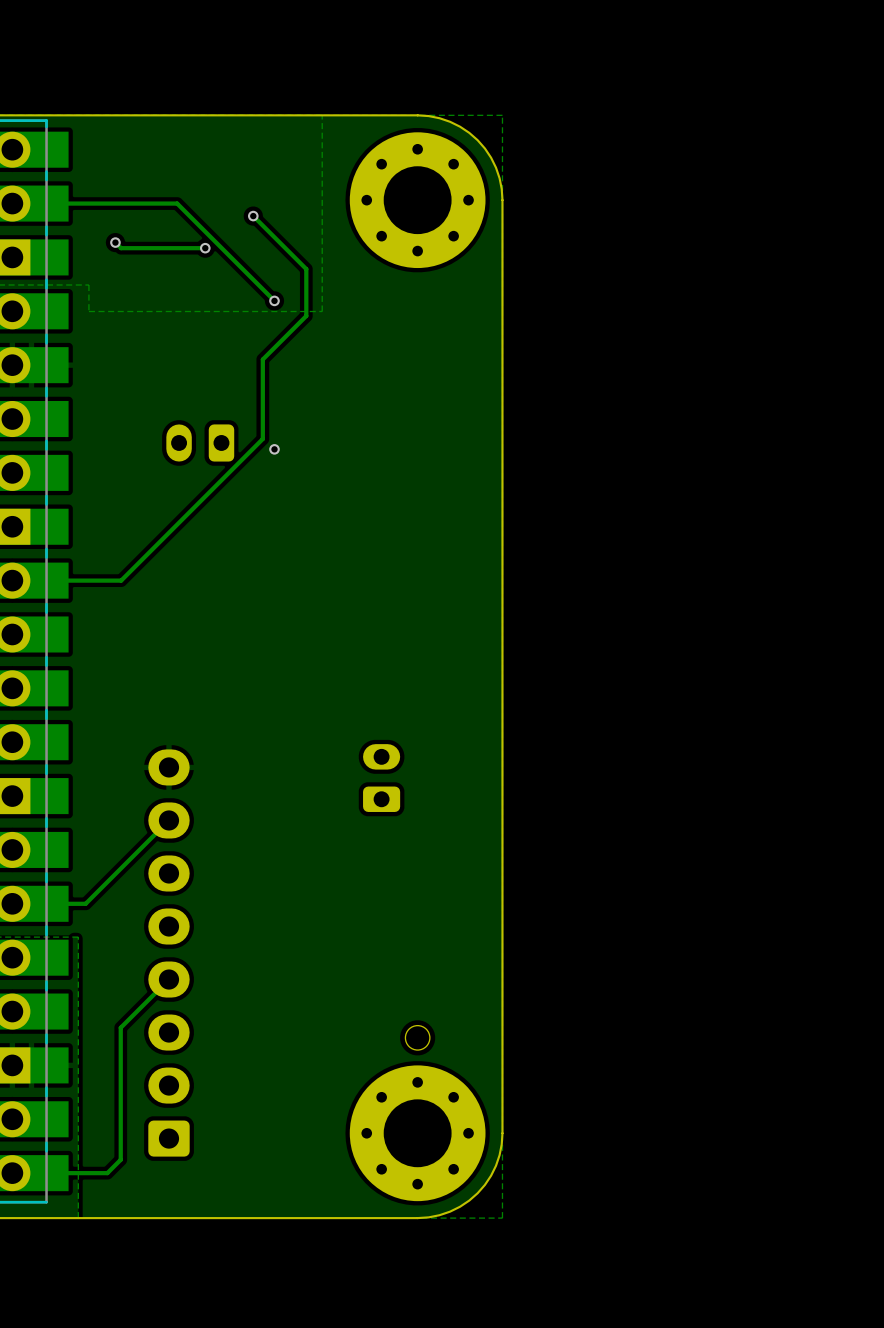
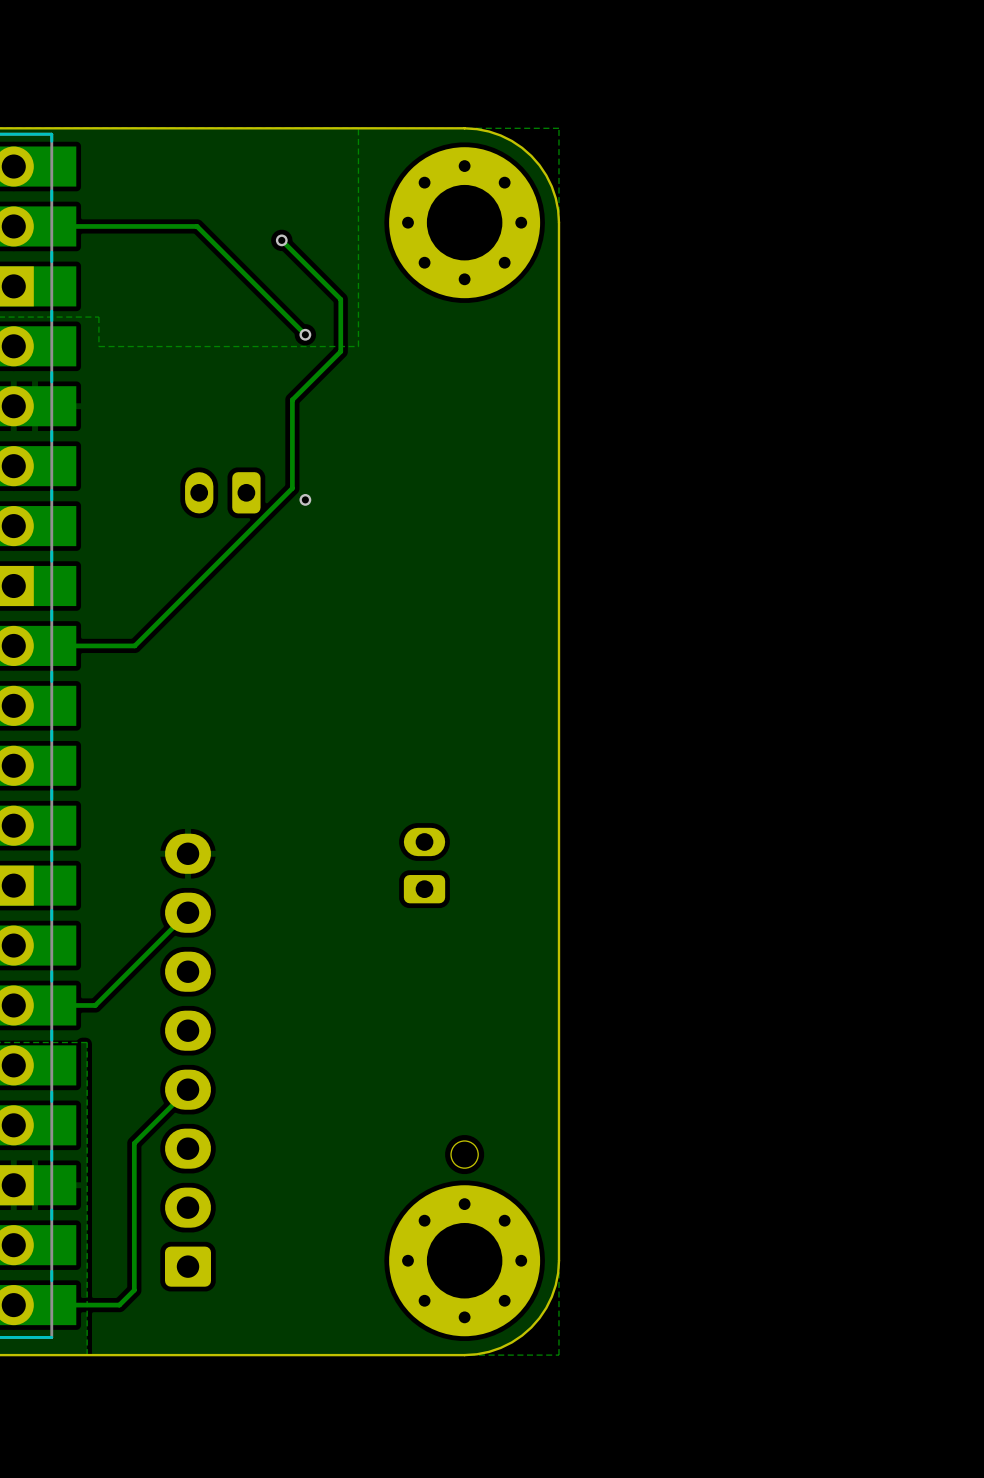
track: (115, 242) (121, 248) (205, 248) -> none
via: (115, 242) -> none
via: (205, 248) -> none

